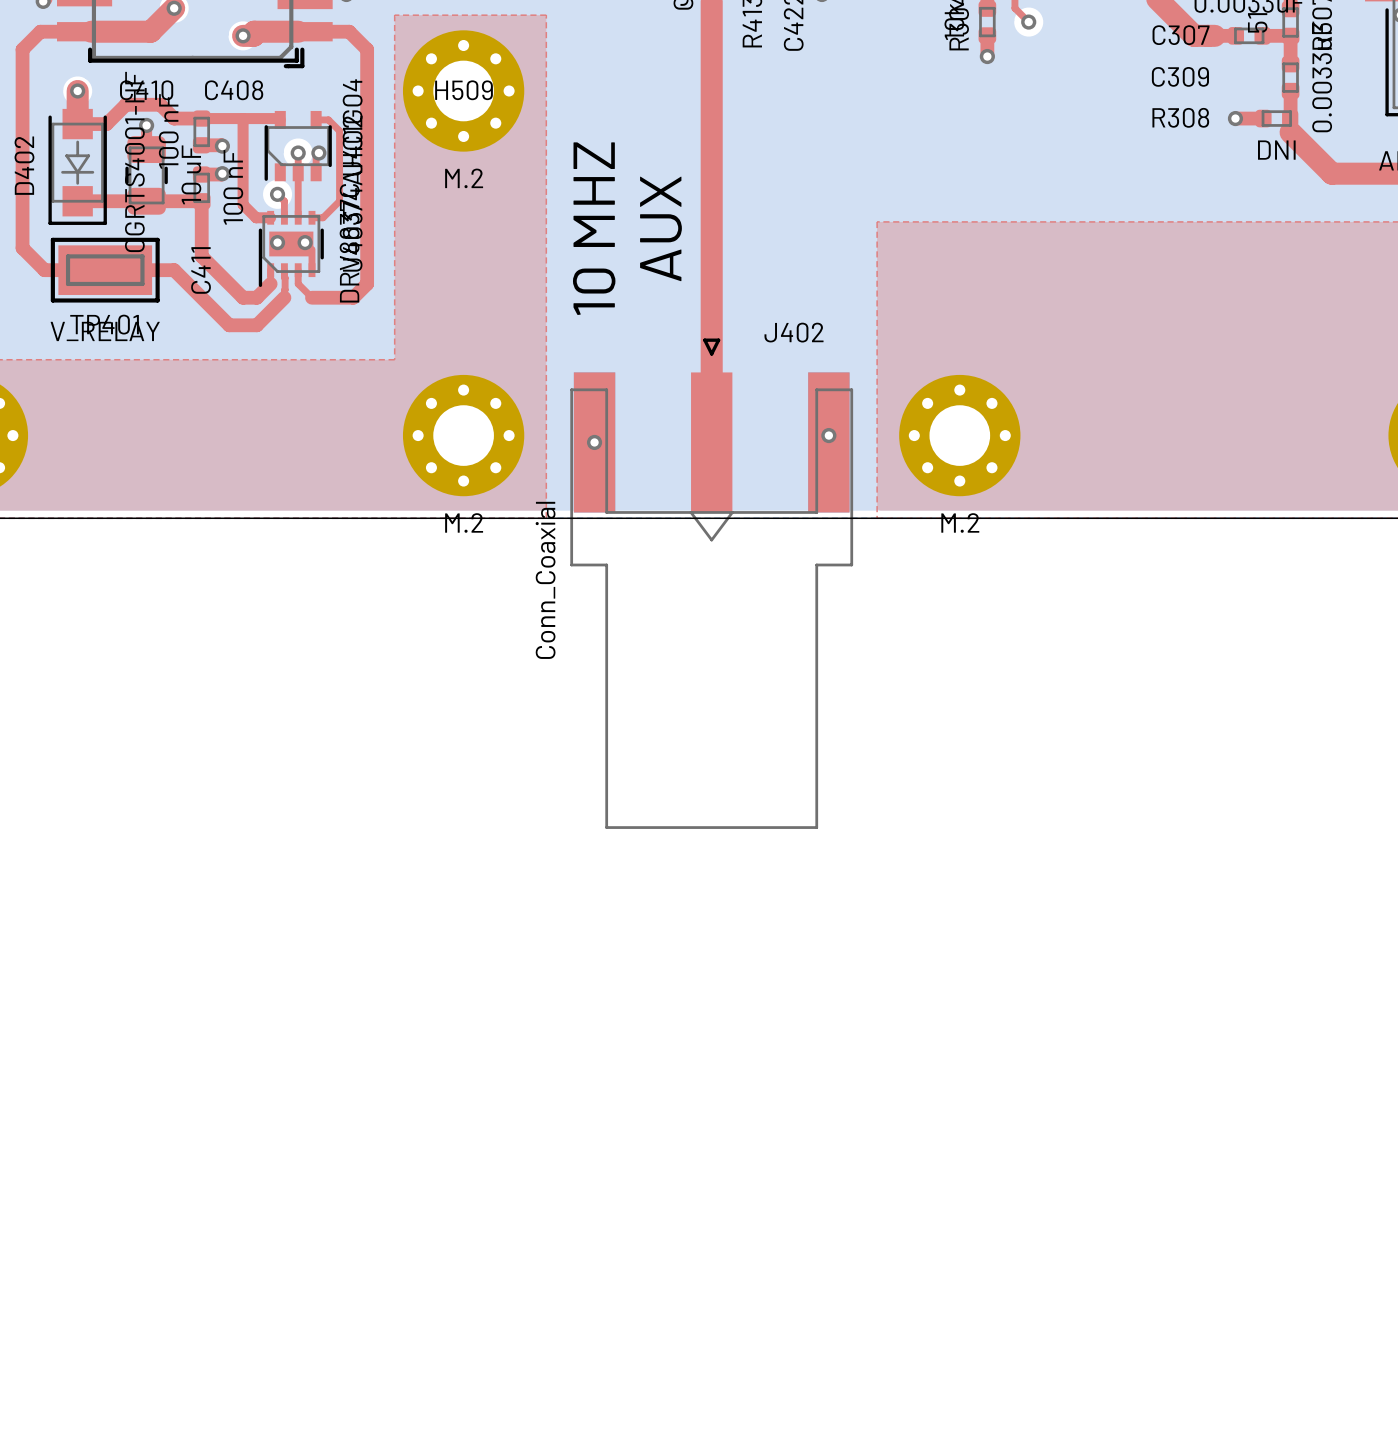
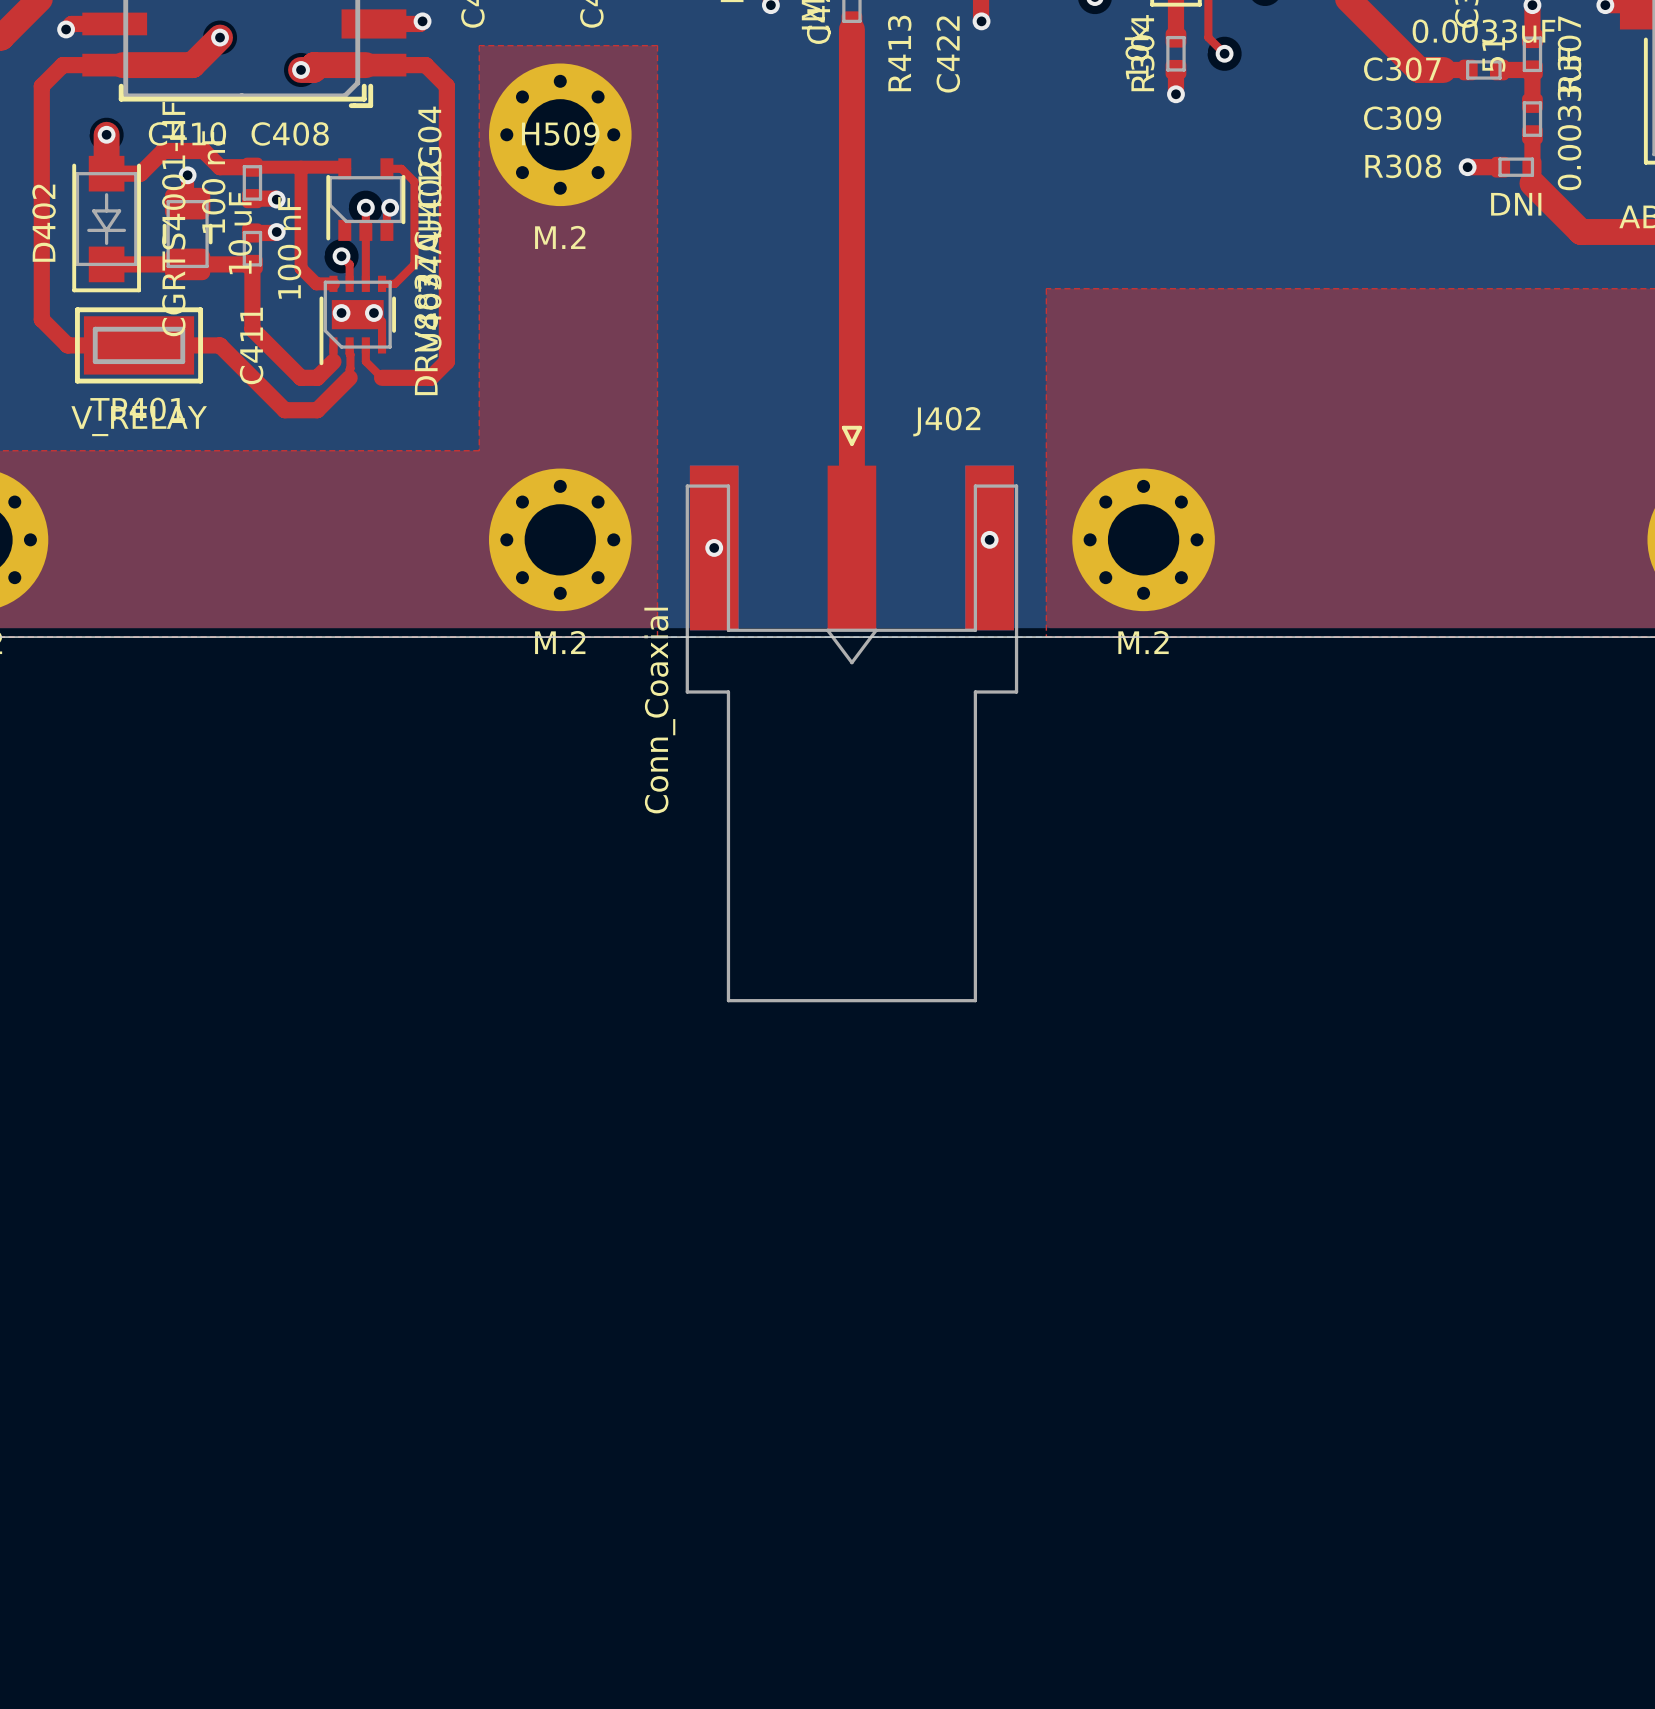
text: 10 MHZ (594, 228) -> none
text: AUX (660, 228) -> none

